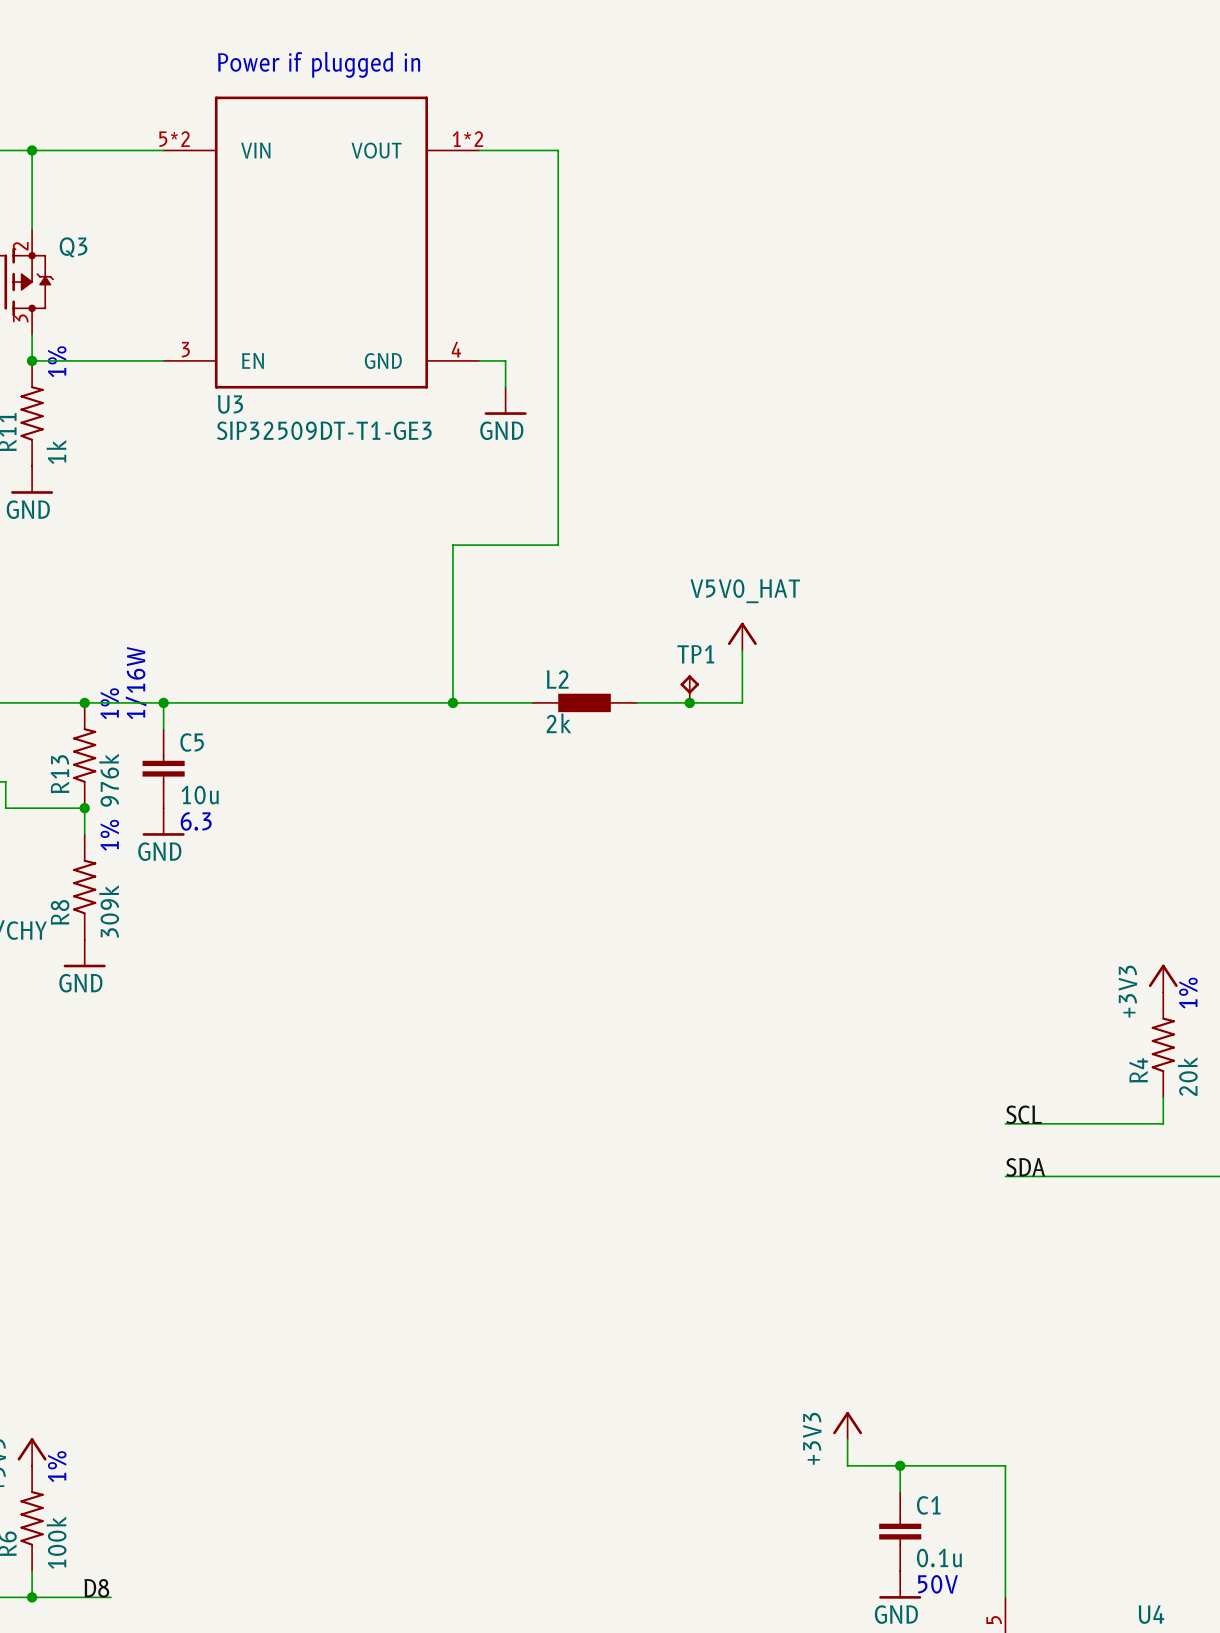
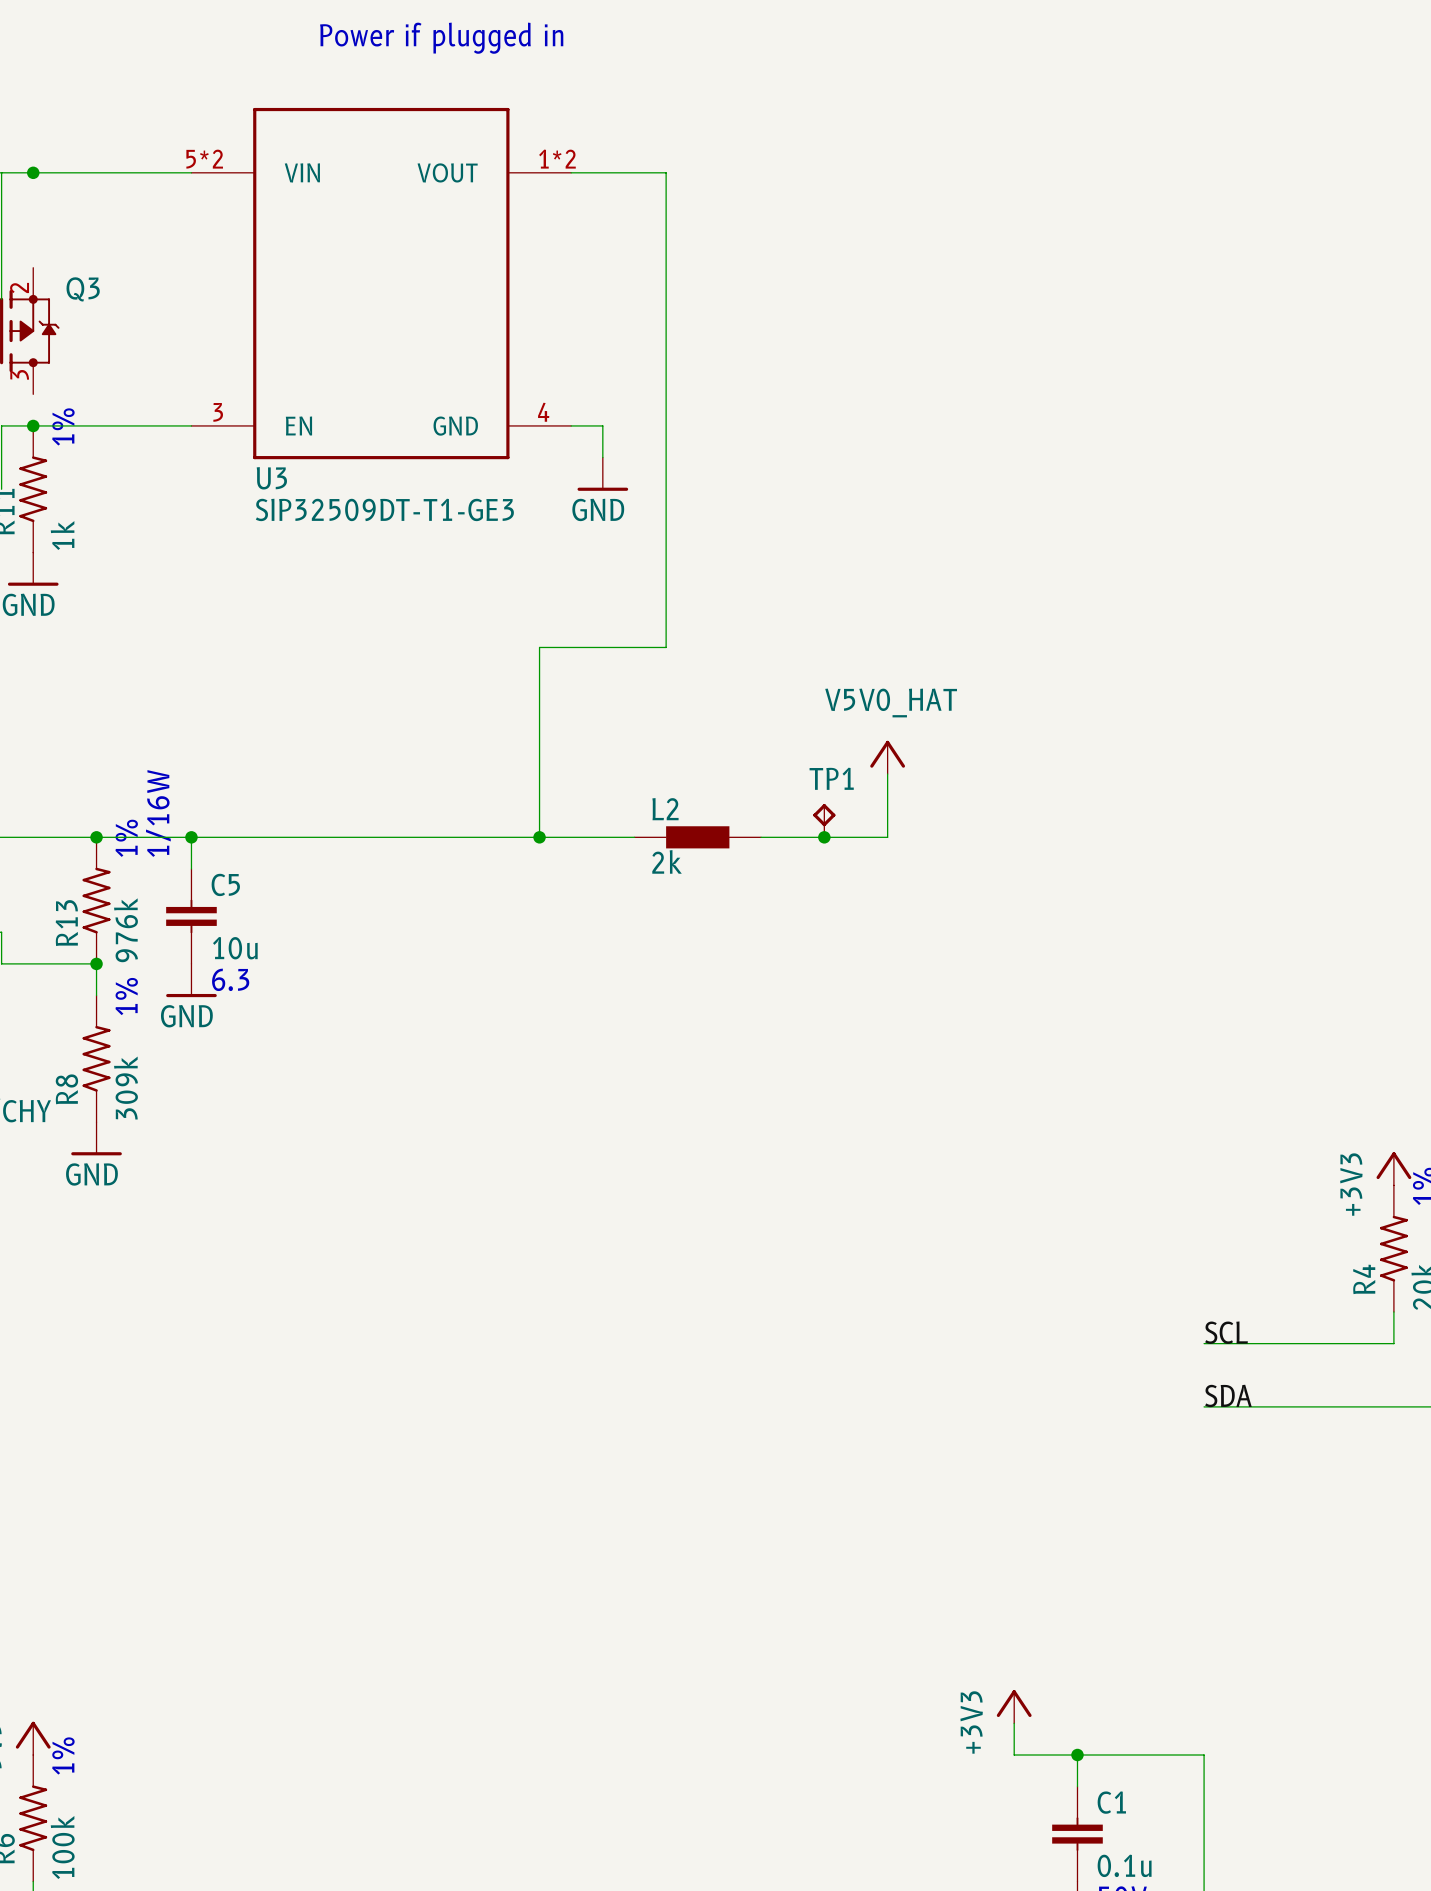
text position: Power if plugged in (319, 64) -> Power if plugged in (441, 38)
wire: none -> (1, 172) (1, 299)
wire: (32, 150) (32, 229) -> none
wire: (32, 334) (32, 360) -> (1, 489) (1, 425) (33, 425)

